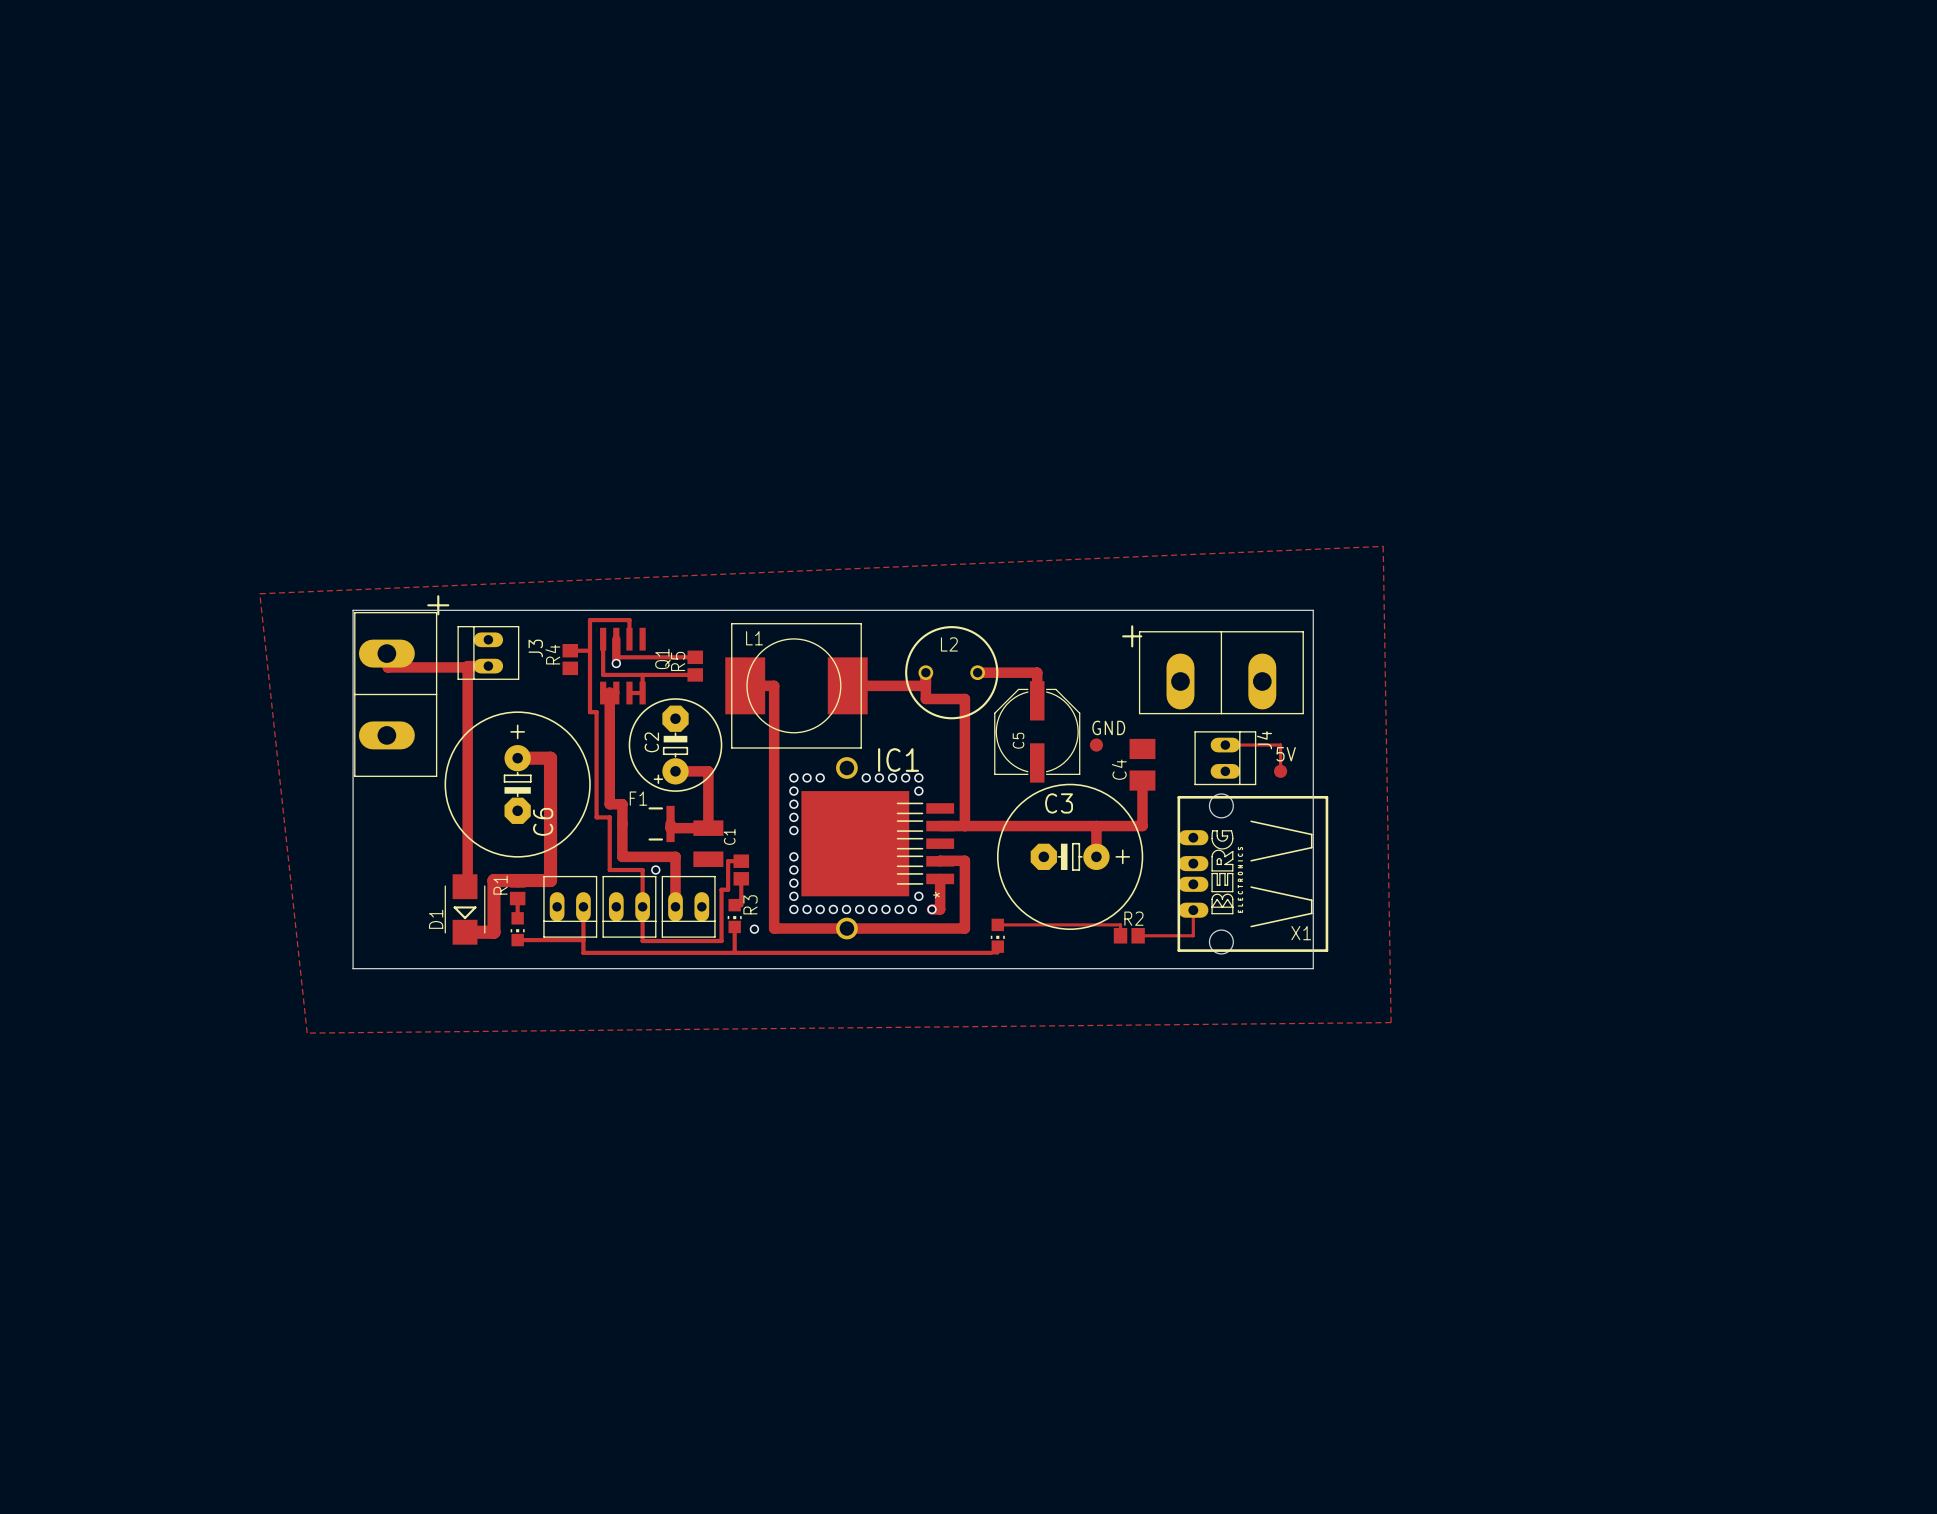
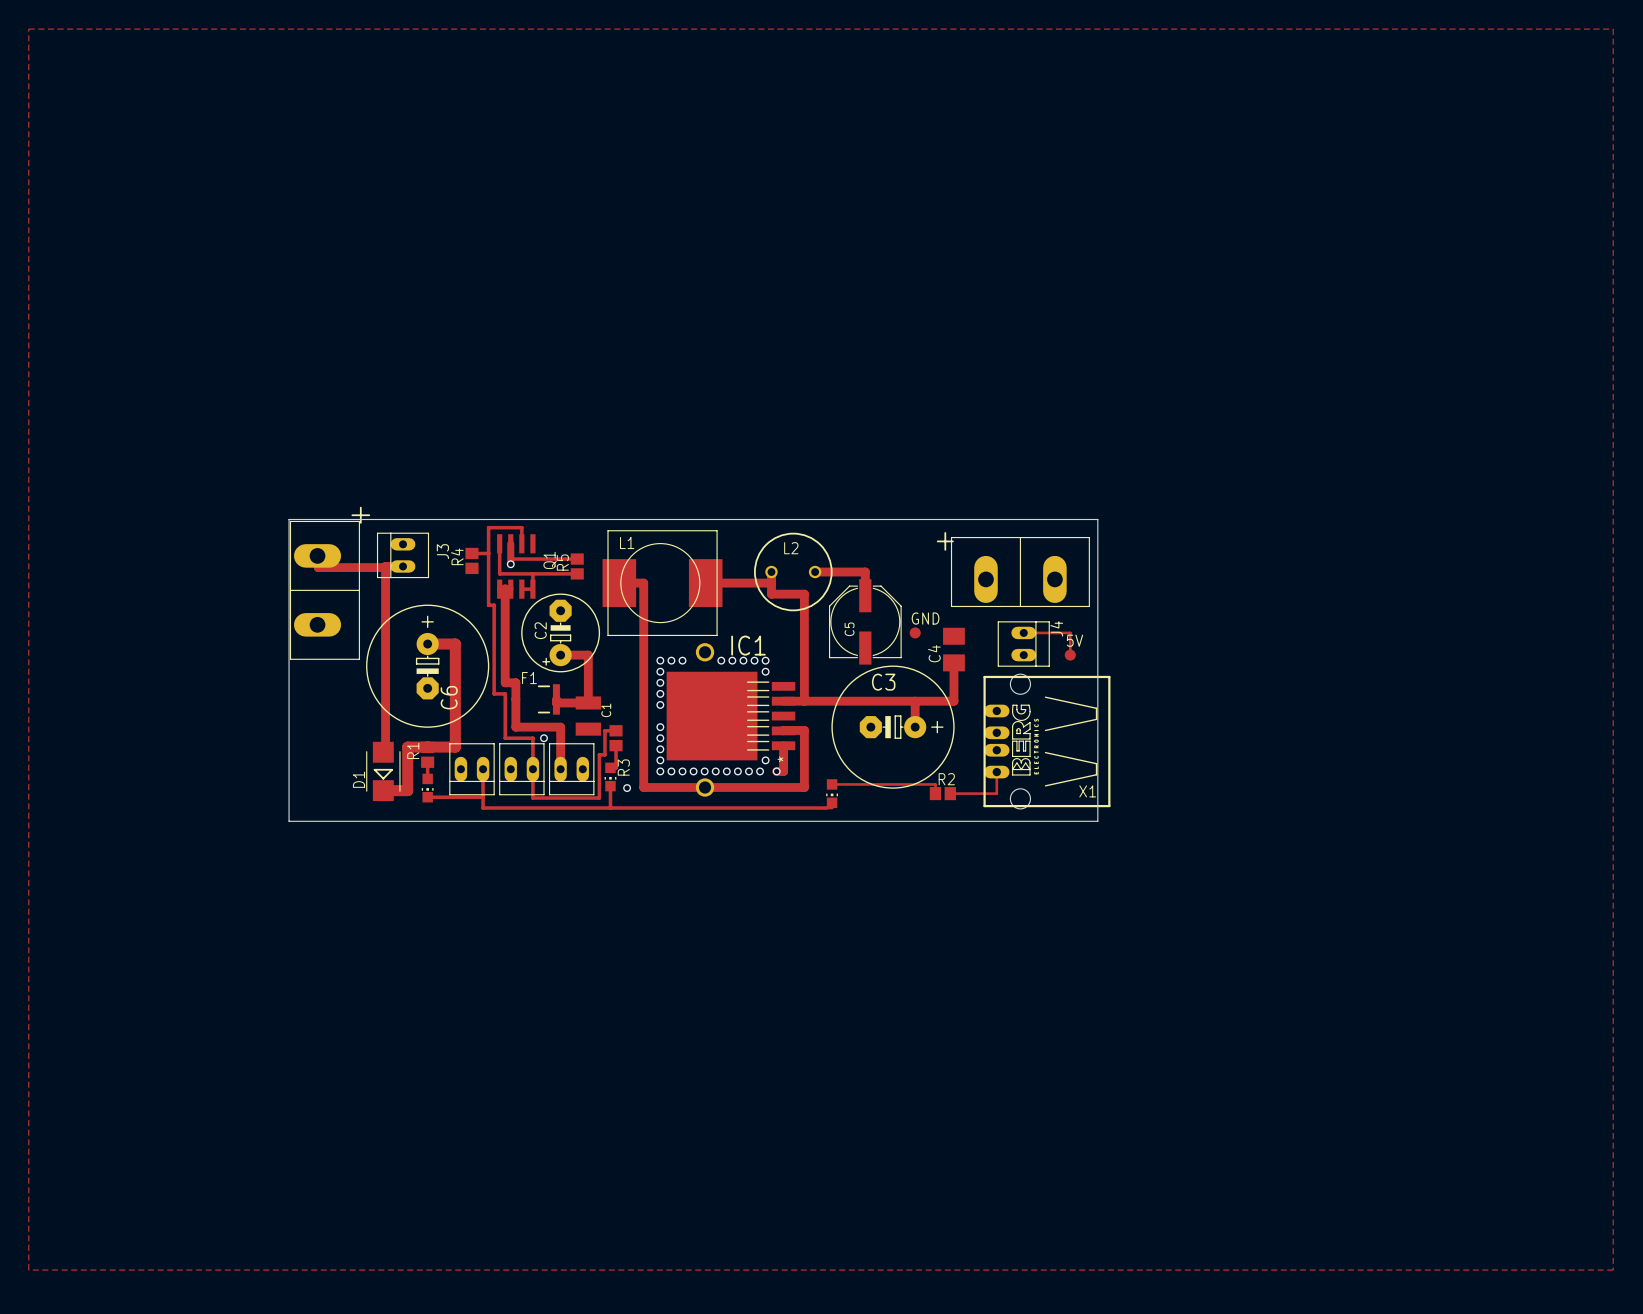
zone outline: none -> (28, 29) (1613, 29) (1613, 1270) (28, 1270) (28, 29)
zone outline: (1383, 546) (259, 593) (307, 1033) (1391, 1022) (1383, 546) -> none

